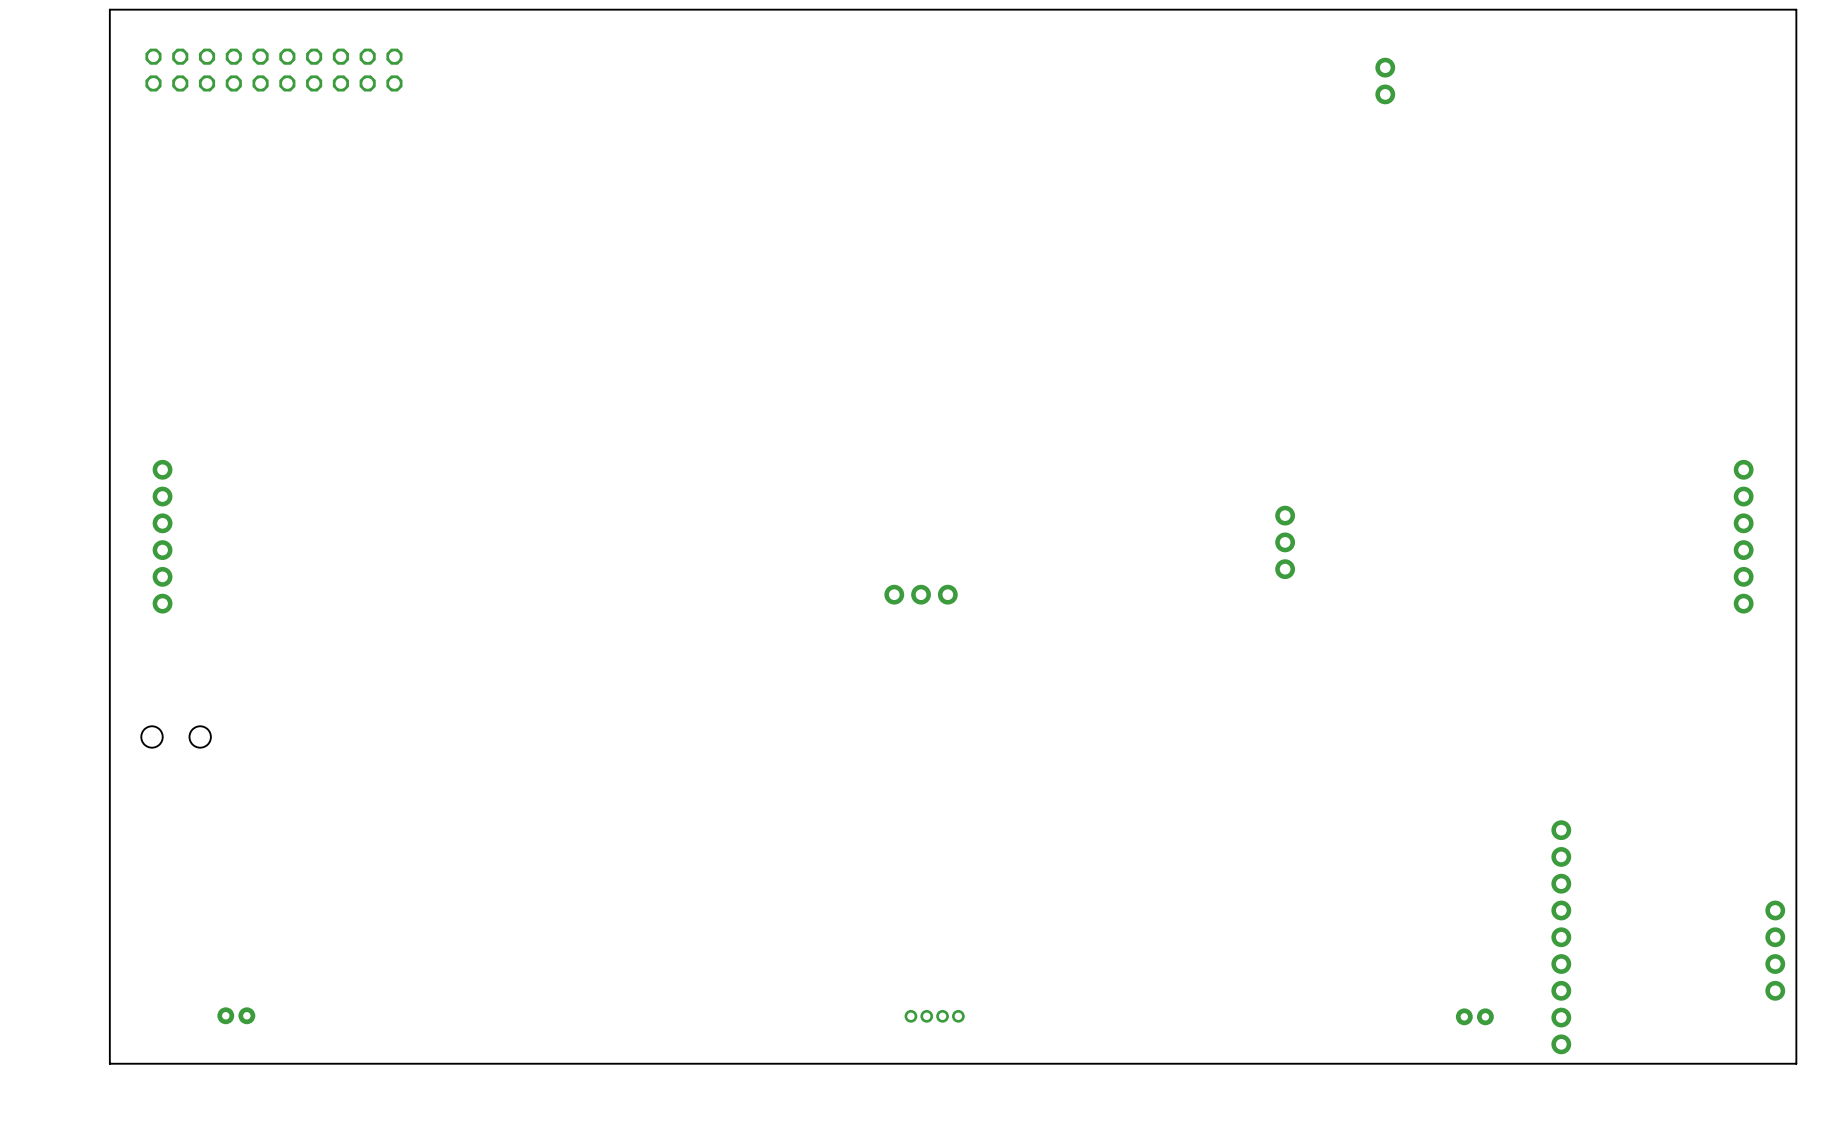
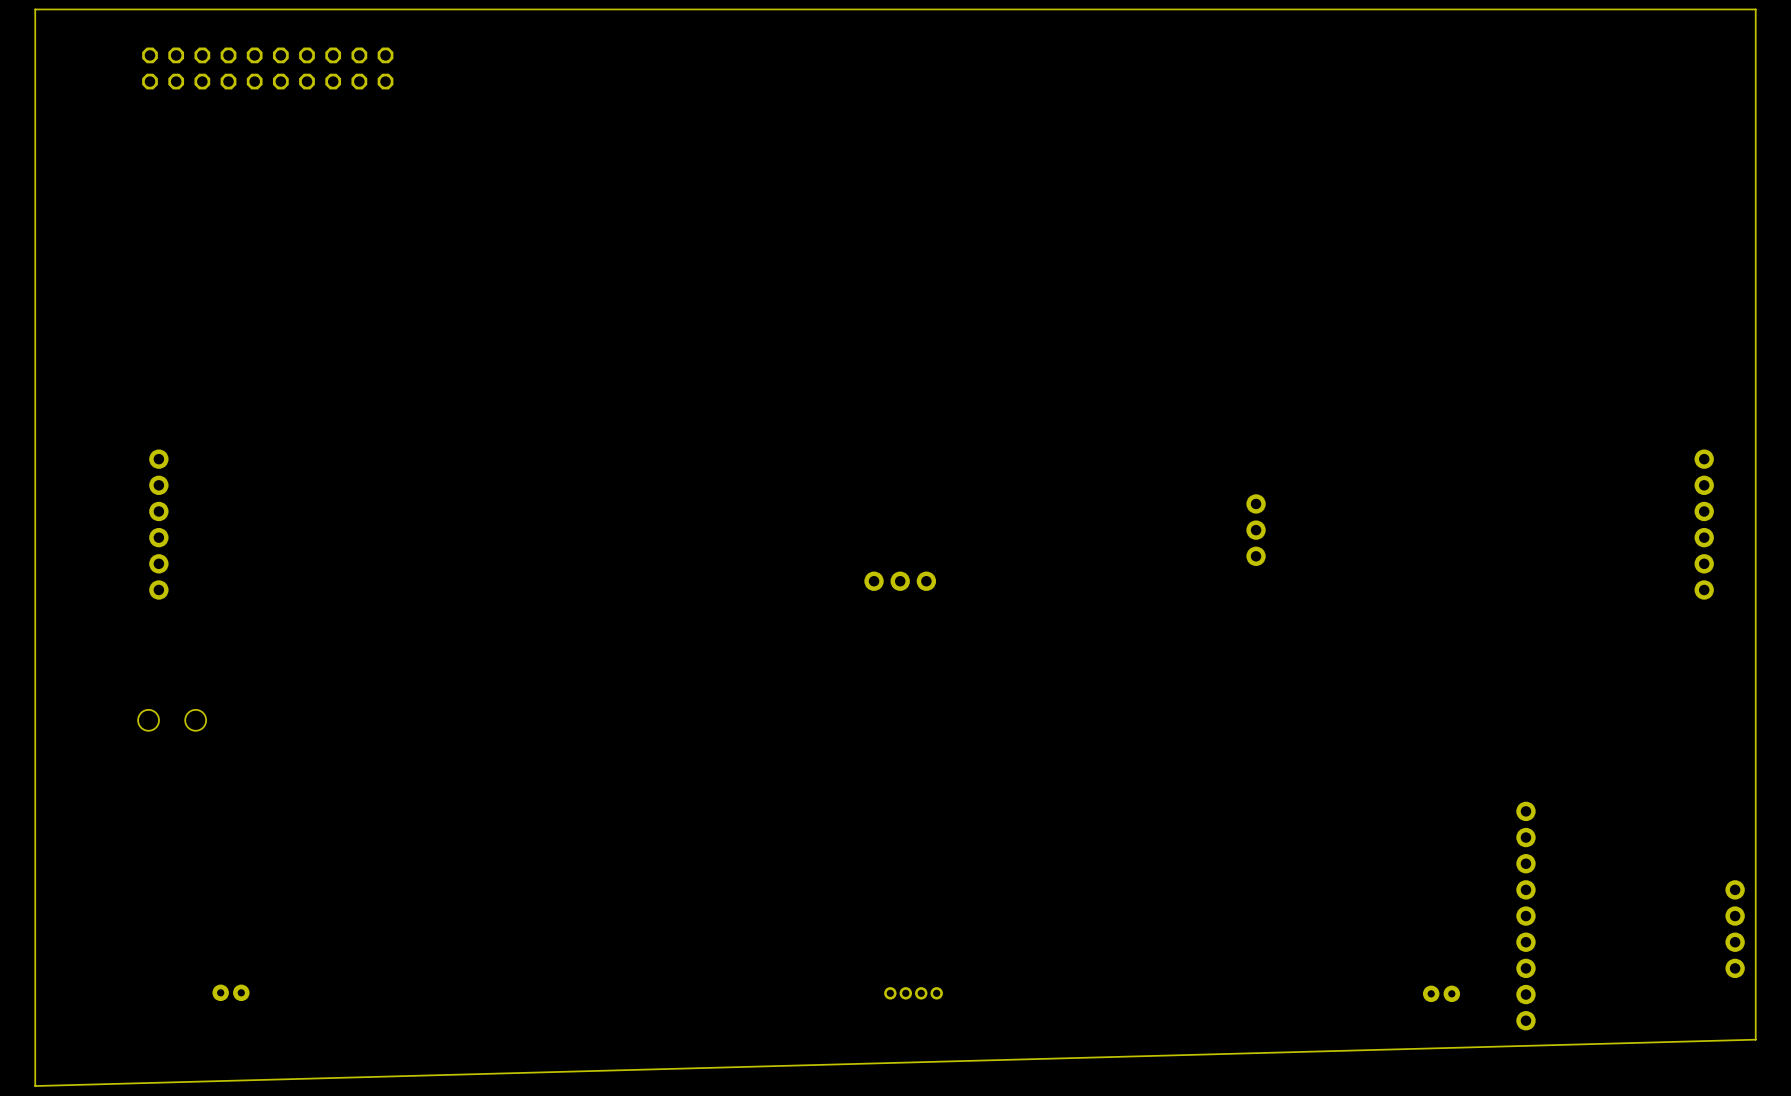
board edge: (109, 9) (109, 1063) (1796, 1063) -> (107, 9) (35, 9) (35, 1086) (1755, 1039)
part: (1385, 81) -> none

